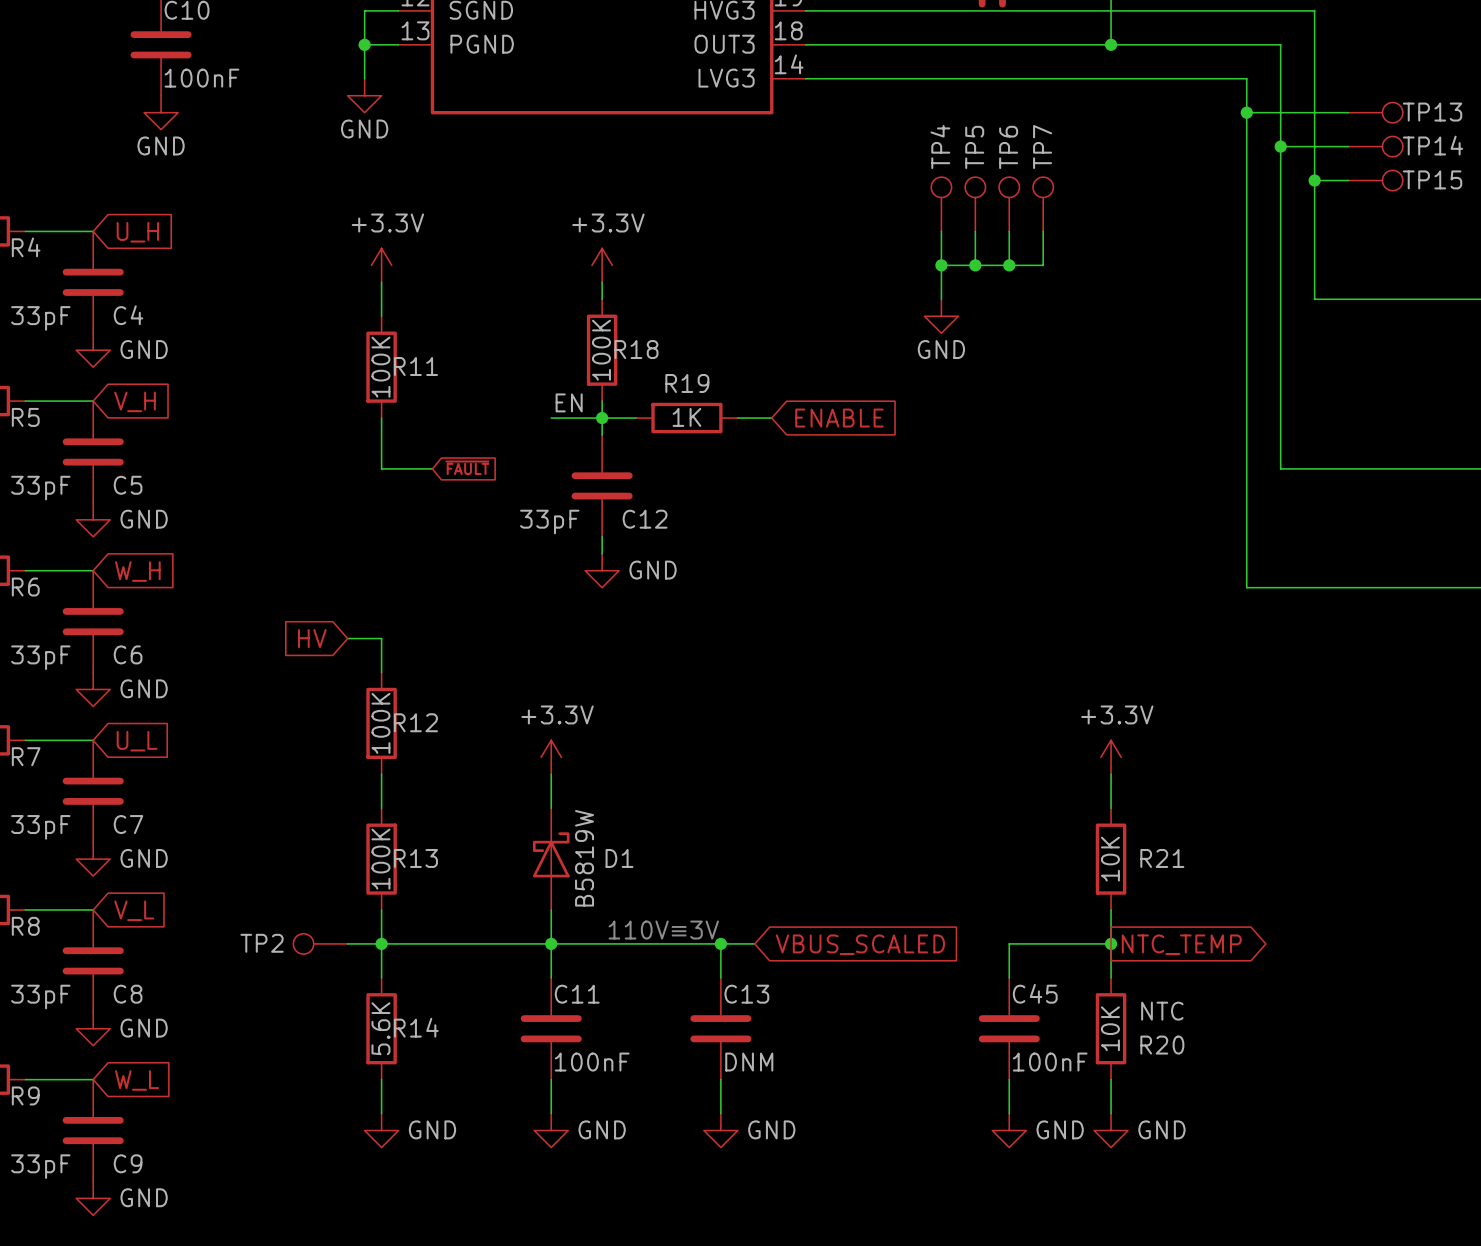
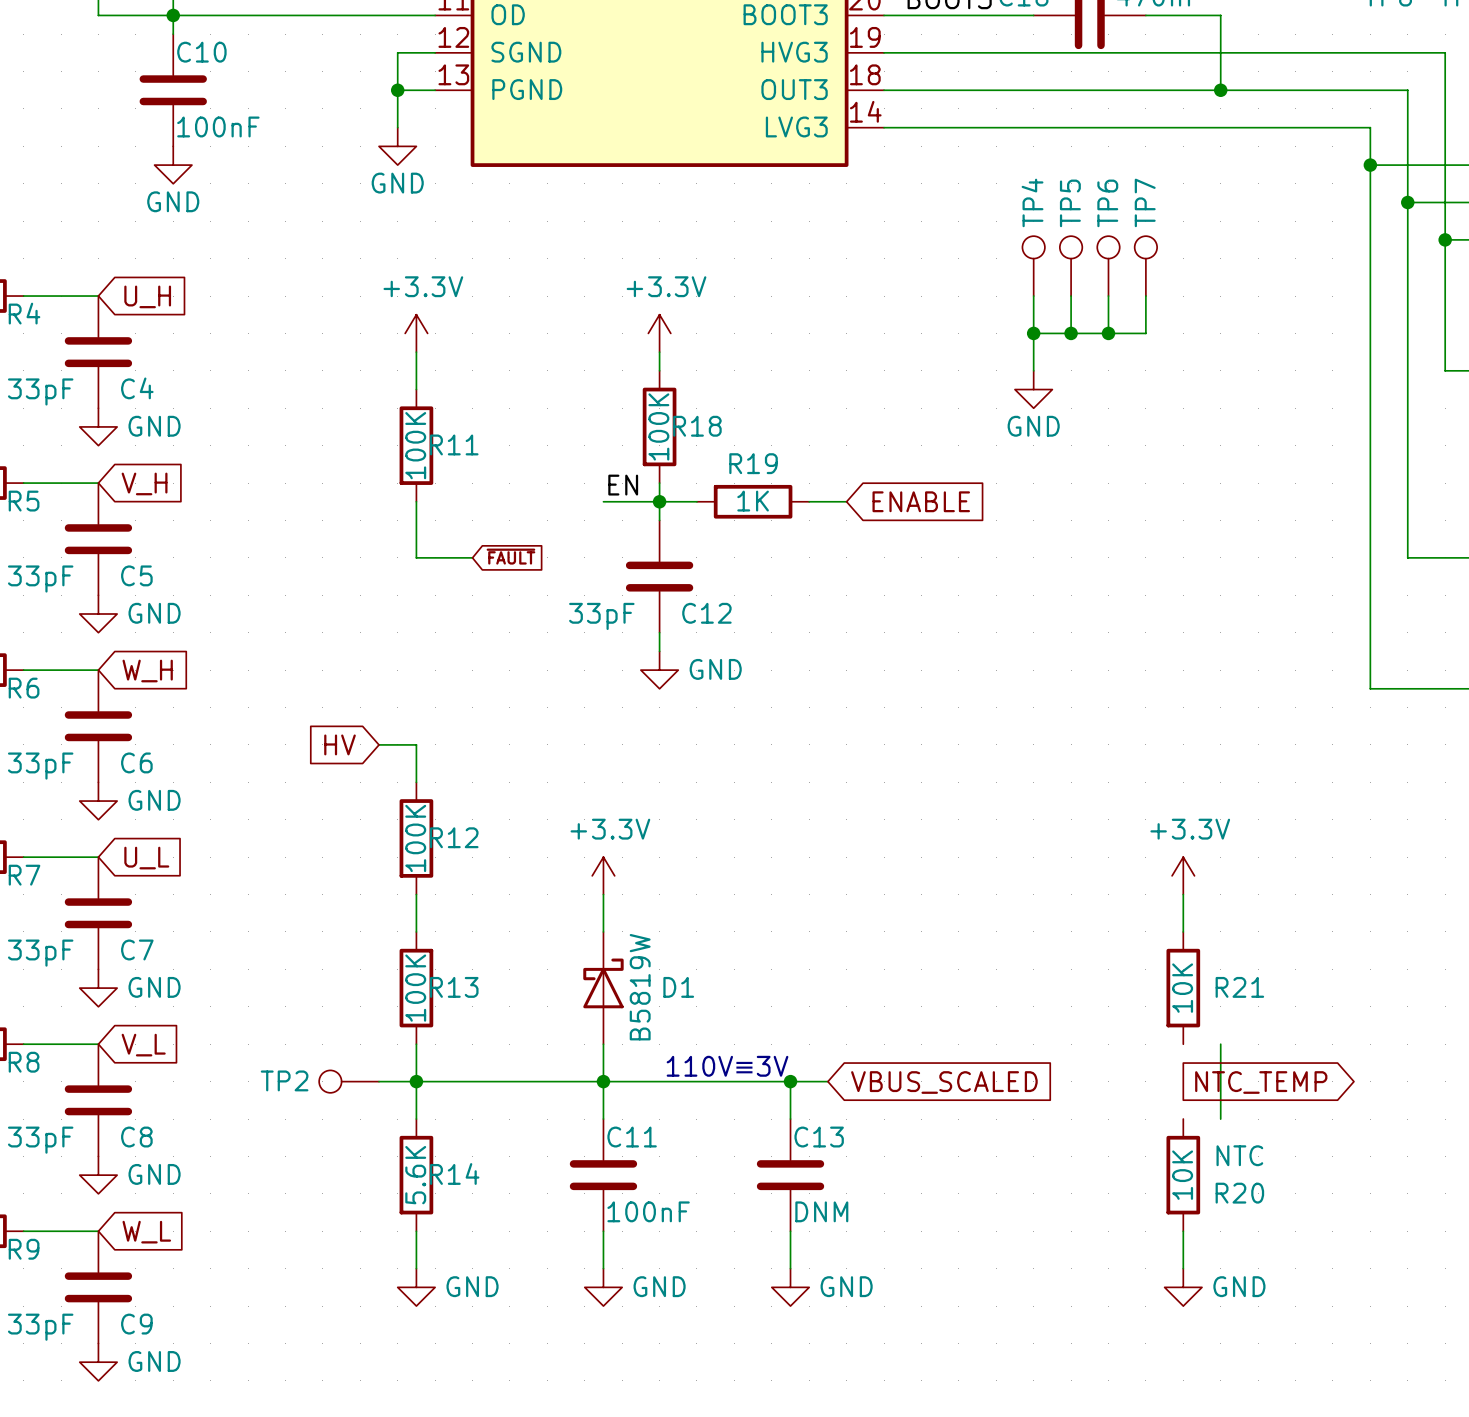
power symbol position: +3.3V (1111, 757) -> +3.3V (1183, 875)
wire: (1111, 774) (1111, 808) -> (1183, 894) (1183, 931)
R21 position: (1111, 859) -> (1183, 988)
wire: (1111, 943) (1009, 943) (1009, 977) -> none
junction: (1111, 943) -> none
global label position: NTC_TEMP (1181, 944) -> NTC_TEMP (1261, 1082)
C45: 100nF (1009, 1028) -> none
R20 position: (1111, 1028) -> (1183, 1175)
wire: (1009, 1079) (1009, 1113) -> none
wire: (1111, 1079) (1111, 1113) -> (1183, 1231) (1183, 1268)
power symbol: GND (1009, 1130) -> none
power symbol: none -> GND (1183, 1287)
power symbol: GND (1111, 1130) -> none

